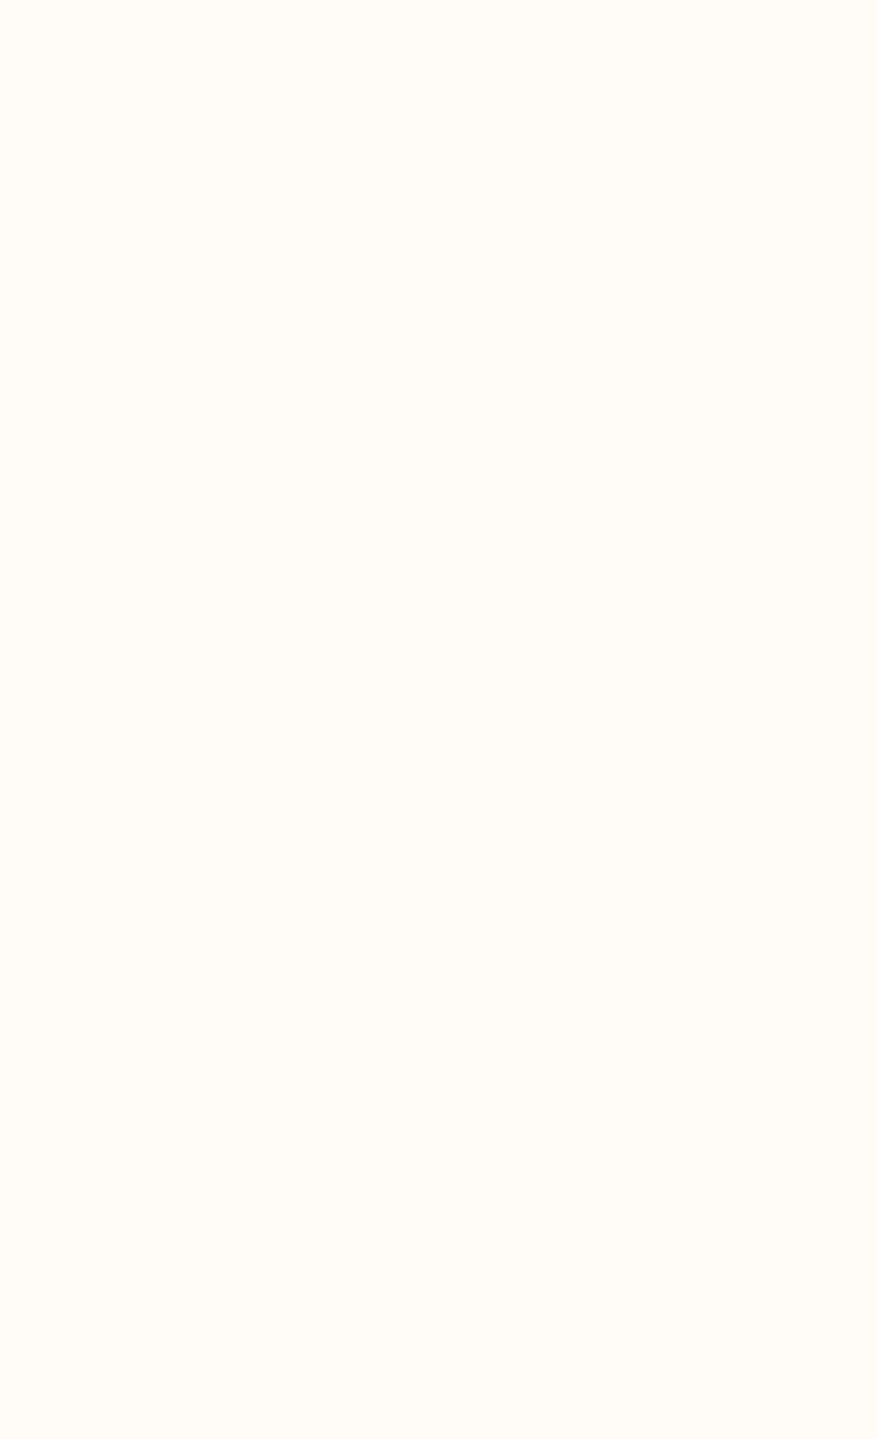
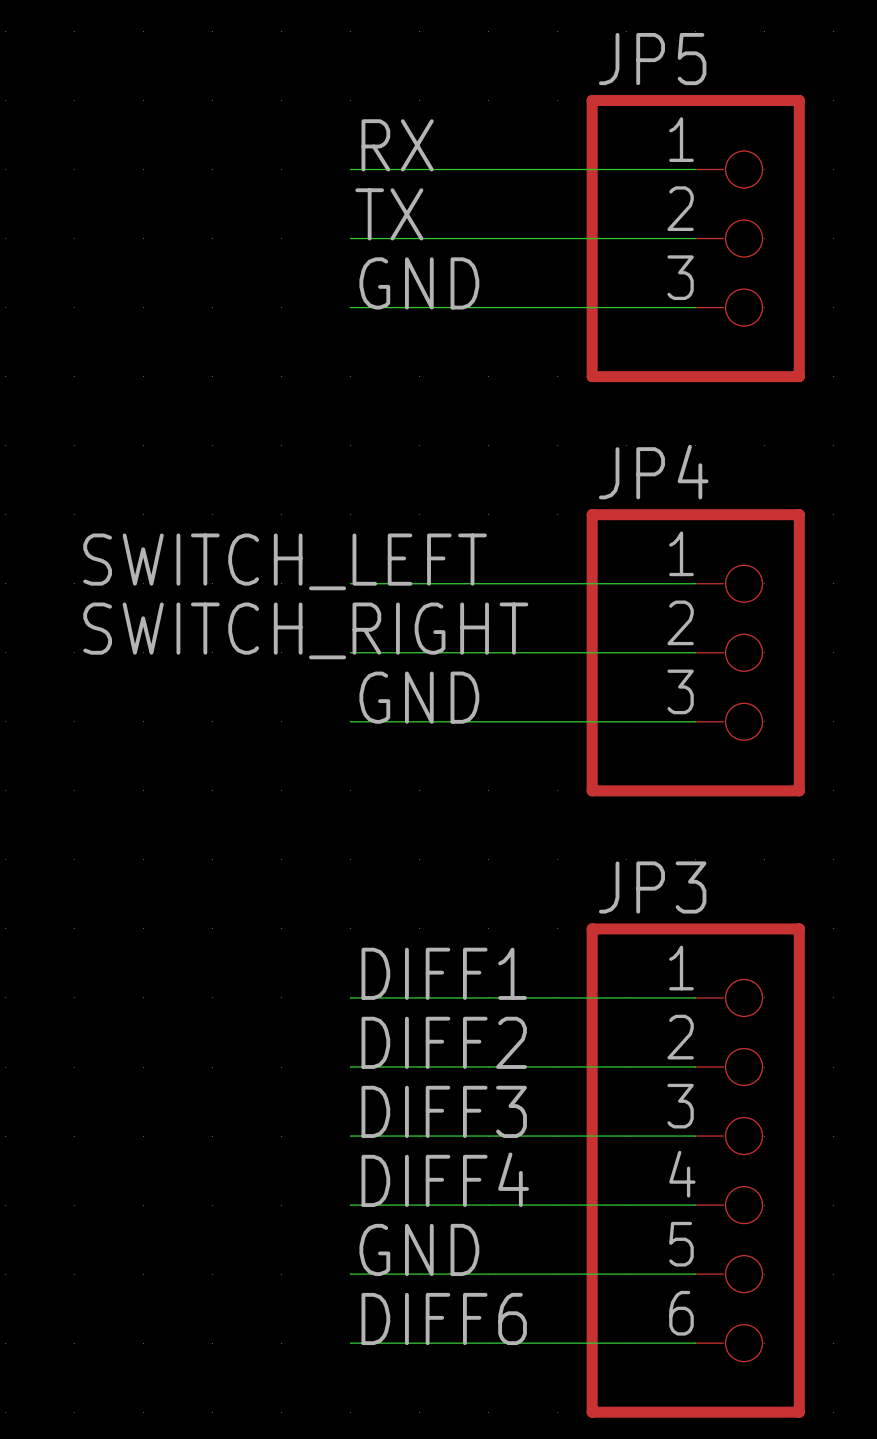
label: none -> RX (397, 145)
wire: none -> (350, 169) (695, 169)
label: none -> TX (389, 214)
wire: none -> (350, 238) (695, 238)
JP5: none -> (695, 238)
label: none -> GND (419, 283)
wire: none -> (350, 307) (695, 307)
label: none -> SWITCH_LEFT (285, 561)
wire: none -> (350, 583) (695, 583)
label: none -> SWITCH_RIGHT (305, 630)
wire: none -> (350, 652) (695, 652)
JP4: none -> (695, 652)
label: none -> GND (419, 697)
wire: none -> (350, 721) (695, 721)
label: none -> DIFF1 (444, 973)
wire: none -> (350, 997) (695, 997)
label: none -> DIFF2 (444, 1042)
wire: none -> (350, 1067) (695, 1067)
label: none -> DIFF3 (444, 1111)
wire: none -> (350, 1136) (695, 1136)
JP3: none -> (695, 1170)
label: none -> DIFF4 (445, 1179)
wire: none -> (350, 1205) (695, 1205)
label: none -> GND (419, 1249)
wire: none -> (350, 1274) (695, 1274)
label: none -> DIFF6 (444, 1318)
wire: none -> (350, 1343) (695, 1343)

